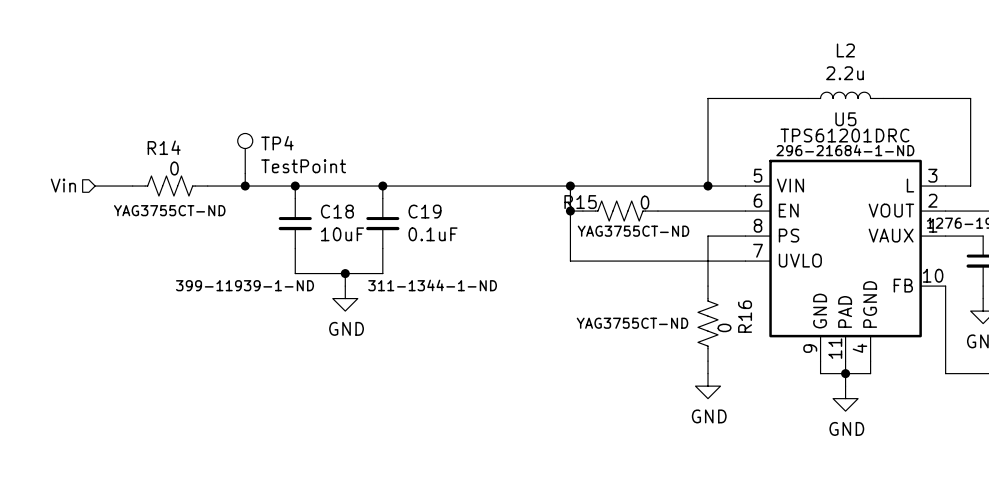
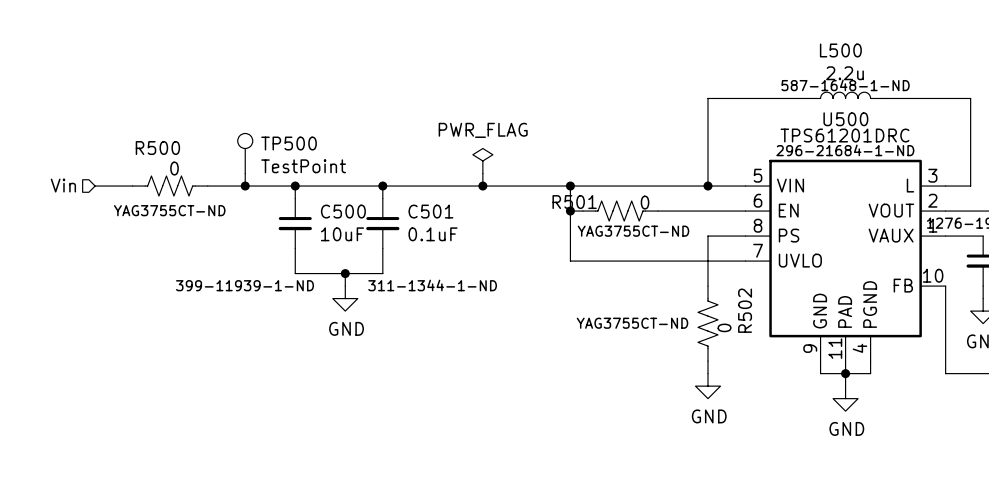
L2 name: L2 (845, 50) -> L500 (840, 50)
L2 text: none -> 587-1648-1-ND (845, 85)
U5 name: U5 (845, 119) -> U500 (845, 119)
TP4 name: TP4 (277, 143) -> TP500 (289, 143)
R14 name: R14 (164, 147) -> R500 (157, 148)
power symbol: none -> PWR_FLAG (482, 161)
wire: none -> (482, 173) (482, 186)
junction: none -> (482, 186)
R15 name: R15 (580, 202) -> R501 (574, 202)
C18 name: C18 (337, 211) -> C500 (343, 211)
C19 name: C19 (424, 211) -> C501 (430, 211)
R16 name: R16 (745, 316) -> R502 (745, 310)

